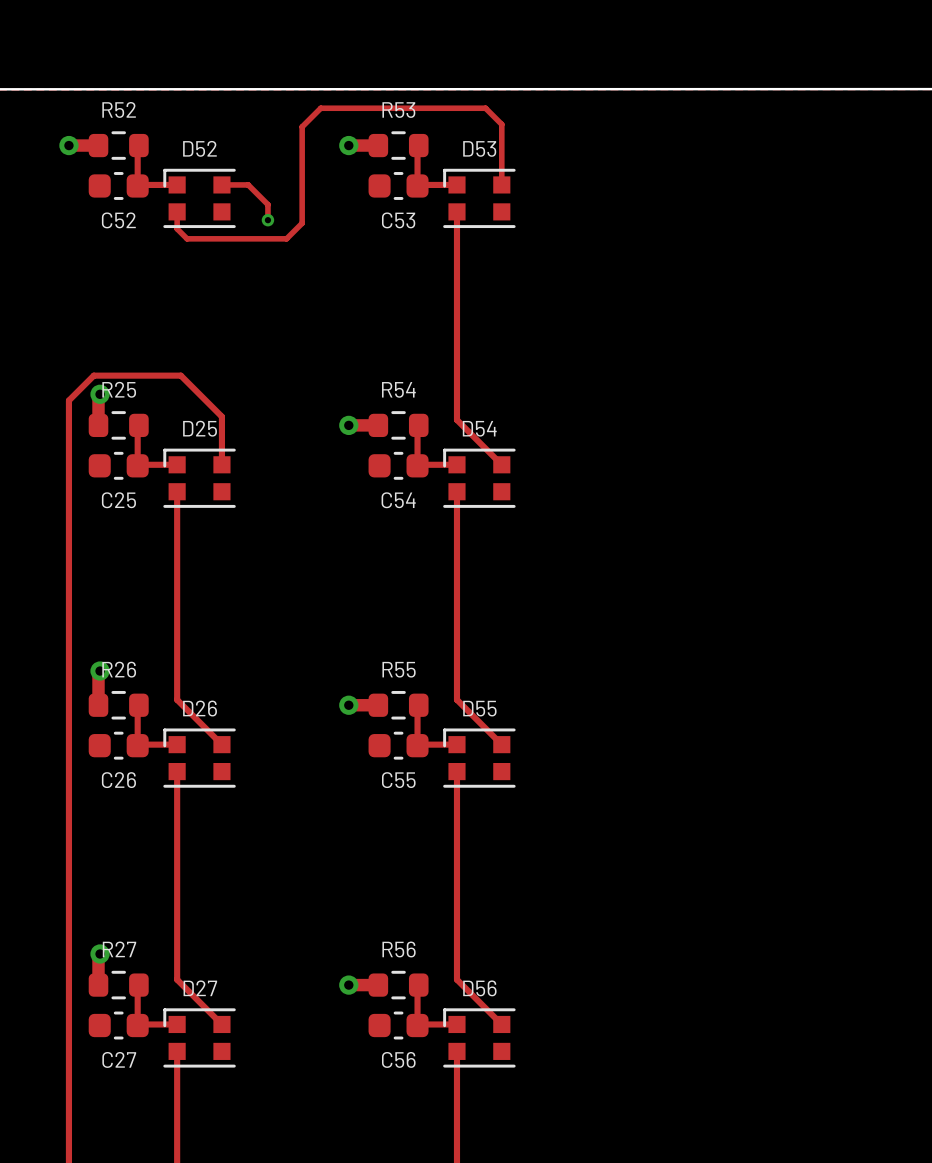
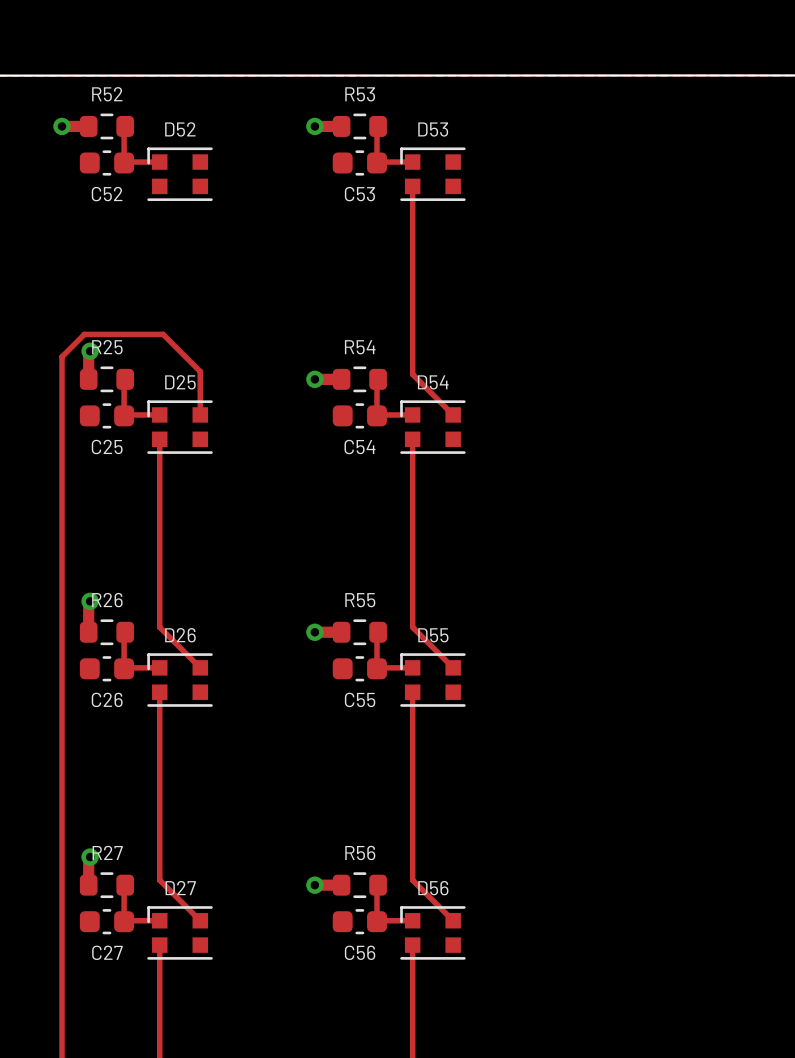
track: (221, 184) (248, 184) (267, 204) (267, 220) -> none
track: (501, 184) (501, 124) (485, 108) (320, 108) (302, 126) (302, 223) (286, 238) (187, 238) (177, 228) (177, 211) -> none
via: (267, 220) -> none

